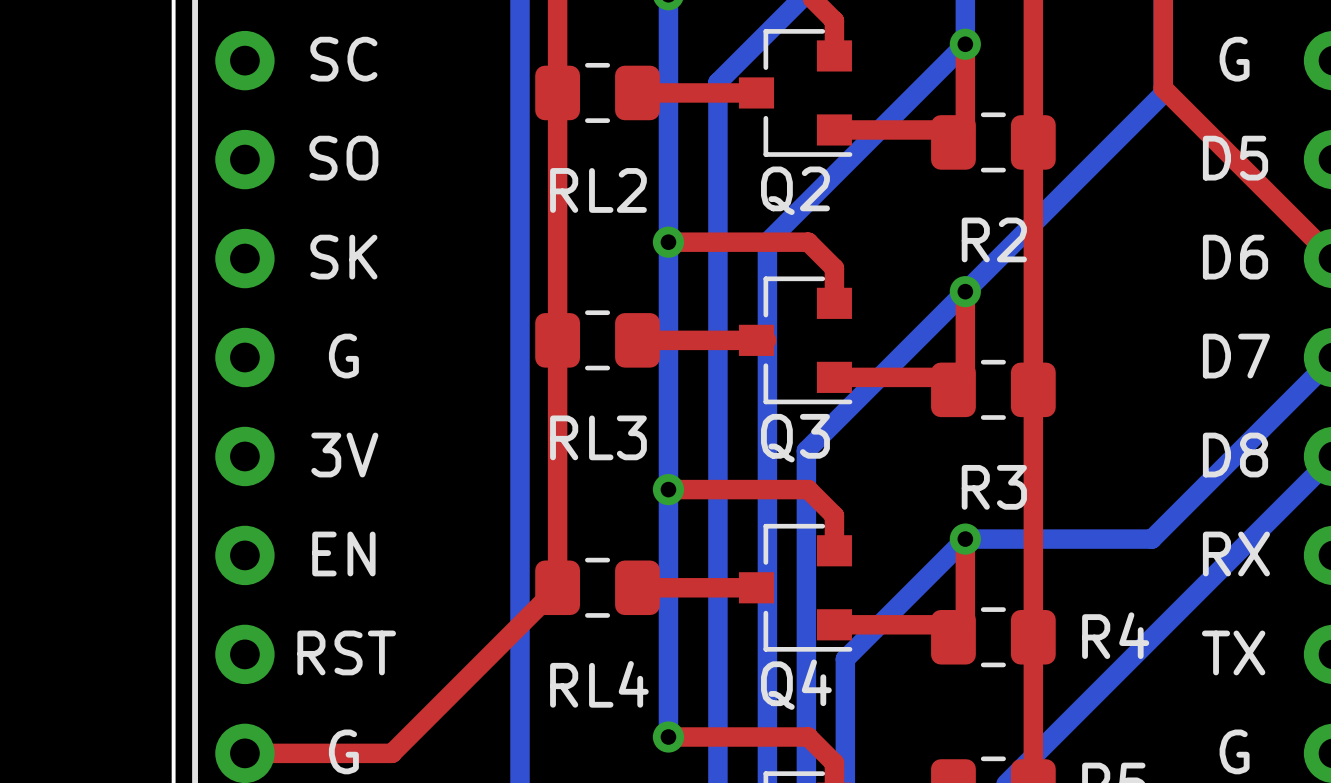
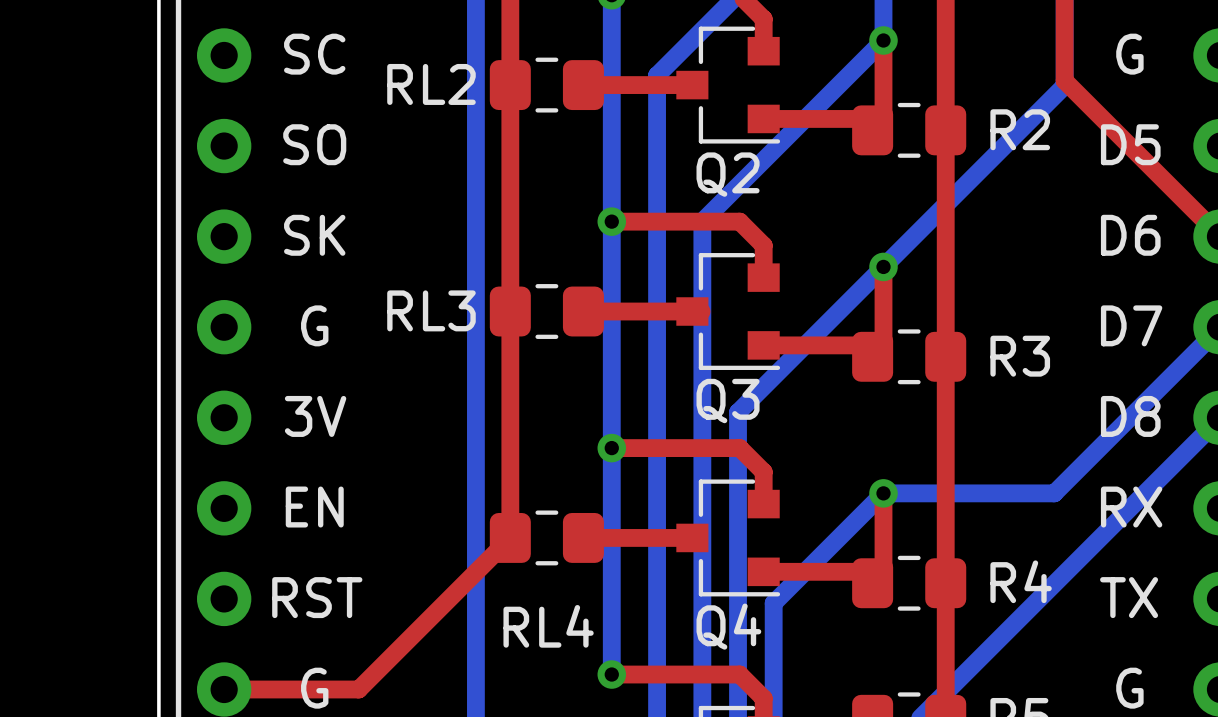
RL2 name position: RL2 (598, 190) -> RL2 (431, 84)
R2 name position: R2 (994, 239) -> R2 (1020, 129)
RL3 name position: RL3 (598, 437) -> RL3 (431, 310)
R3 name position: R3 (994, 487) -> R3 (1020, 356)

